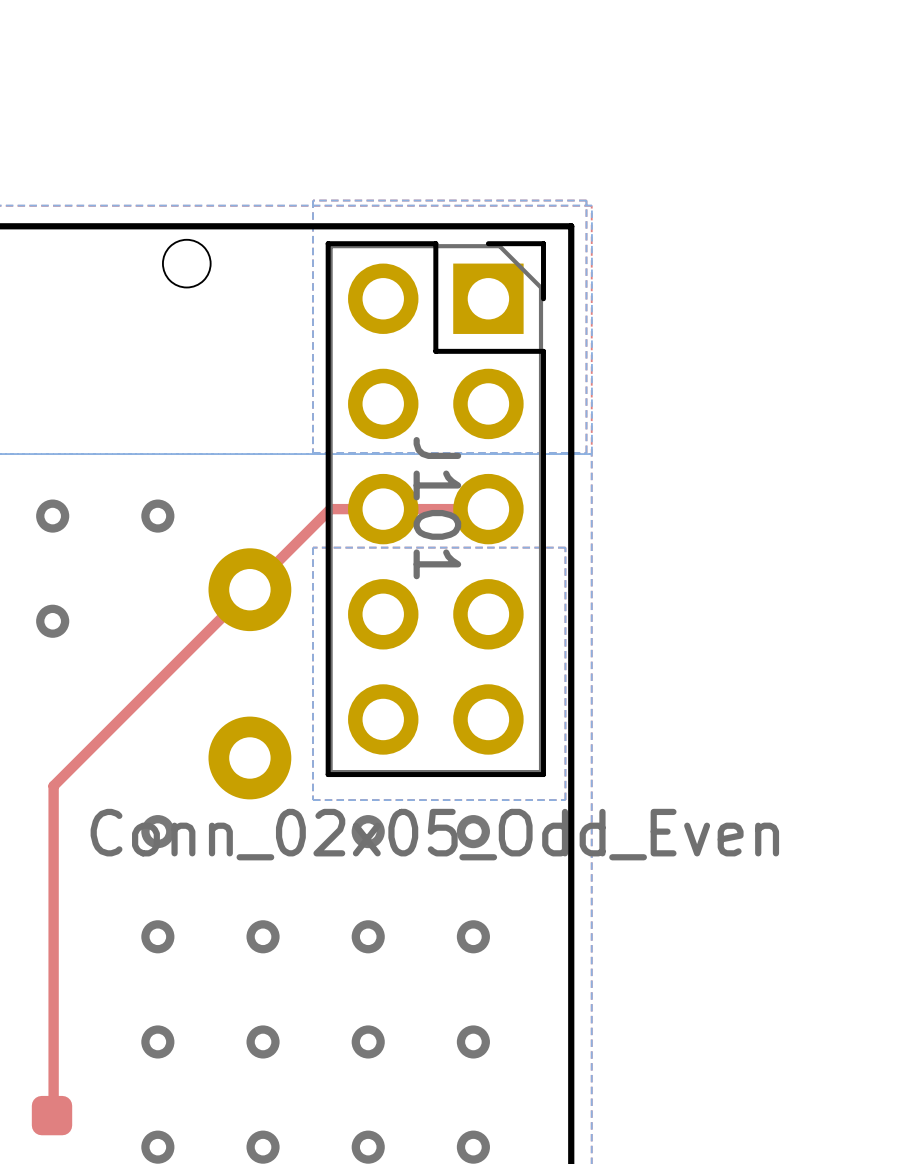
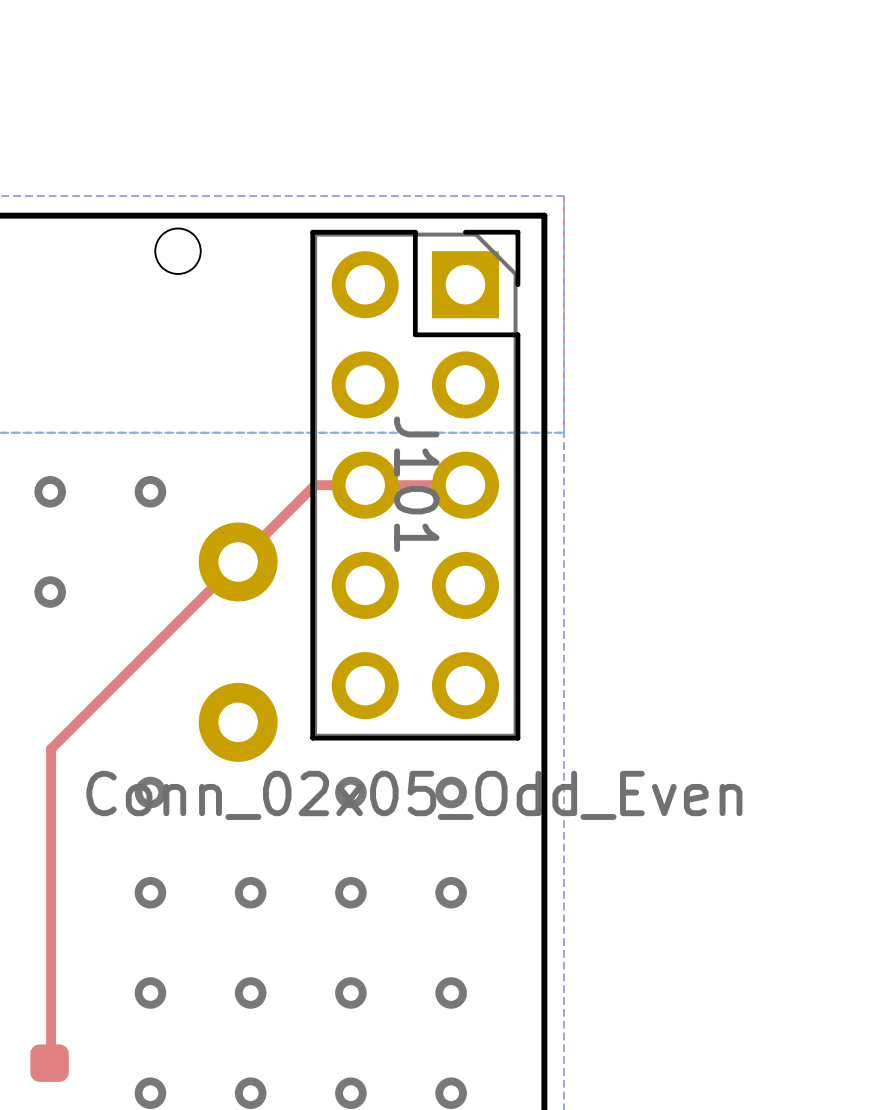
bottom zone outline: (586, 200) (586, 452) (313, 452) (313, 200) (586, 200) -> none
bottom zone outline: (565, 547) (565, 800) (313, 800) (313, 547) (565, 547) -> none

